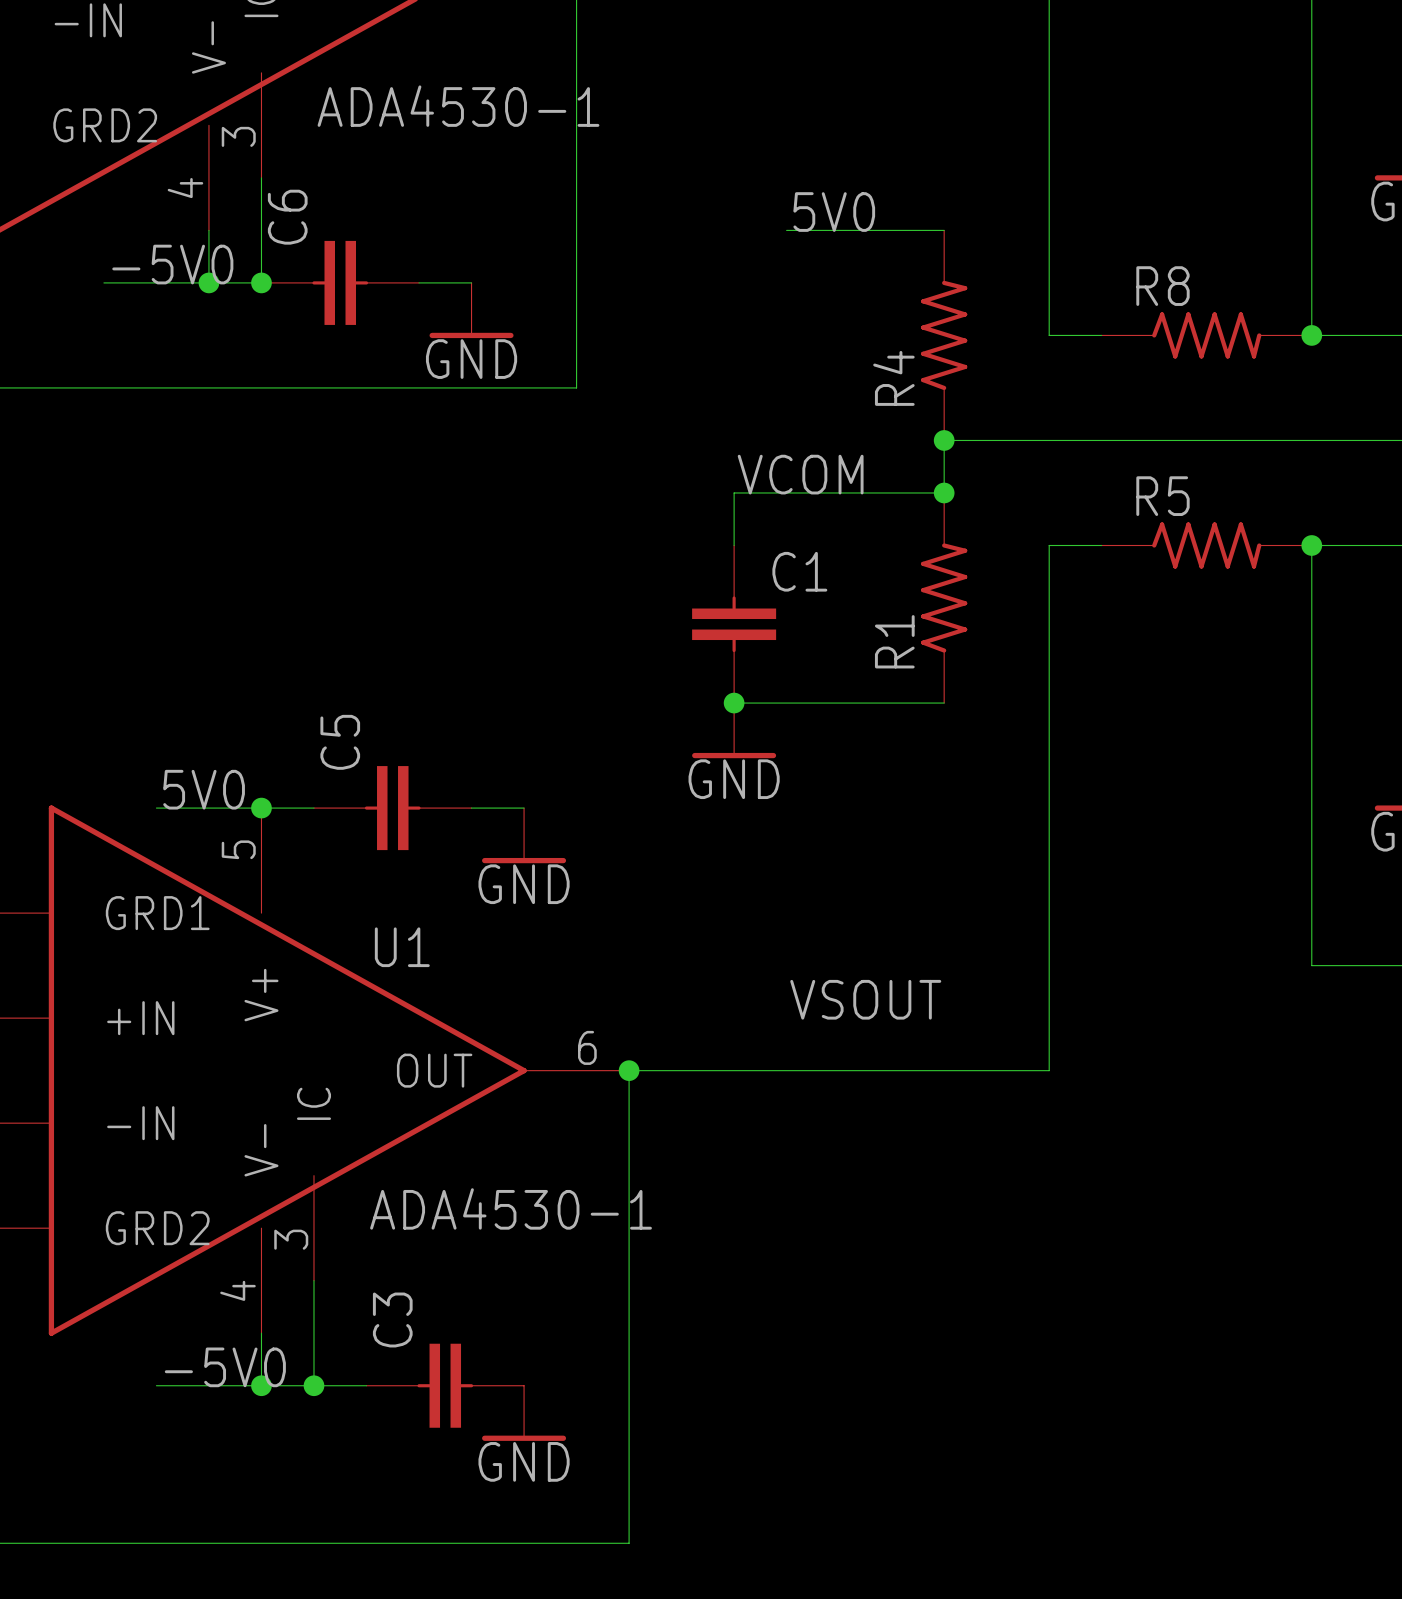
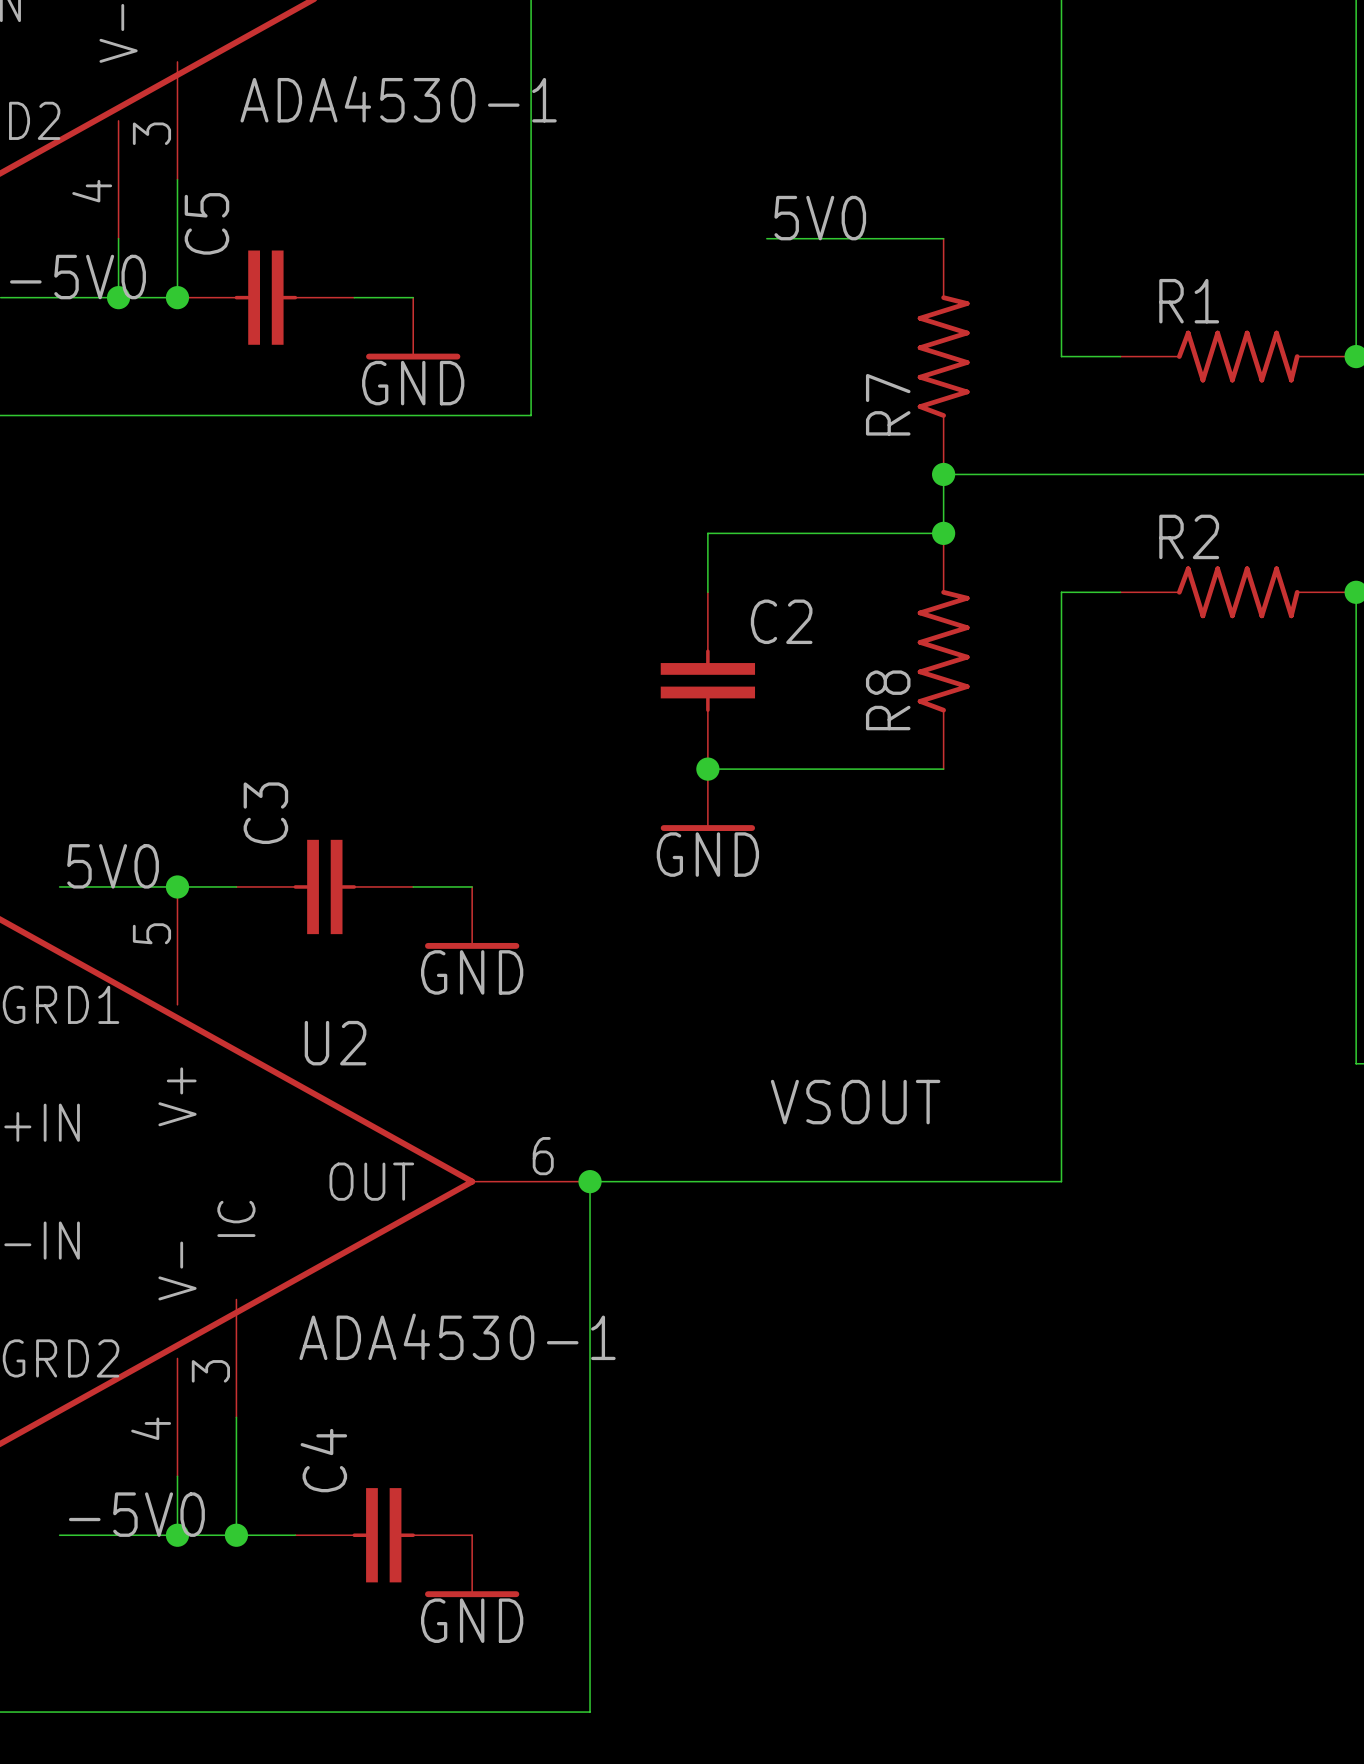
C6 name: C6 (287, 217) -> C5 (206, 223)
R8 name: R8 (1162, 286) -> R1 (1189, 301)
R4 name: R4 (893, 378) -> R7 (888, 404)
label: VCOM (800, 474) -> none
R5 name: R5 (1162, 496) -> R2 (1189, 536)
C1 name: C1 (799, 571) -> C2 (781, 621)
R1 name: R1 (894, 641) -> R8 (888, 700)
C5 name: C5 (340, 742) -> C3 (265, 813)
U1 name: U1 (402, 947) -> U2 (335, 1043)
C3 name: C3 (392, 1320) -> C4 (323, 1460)

